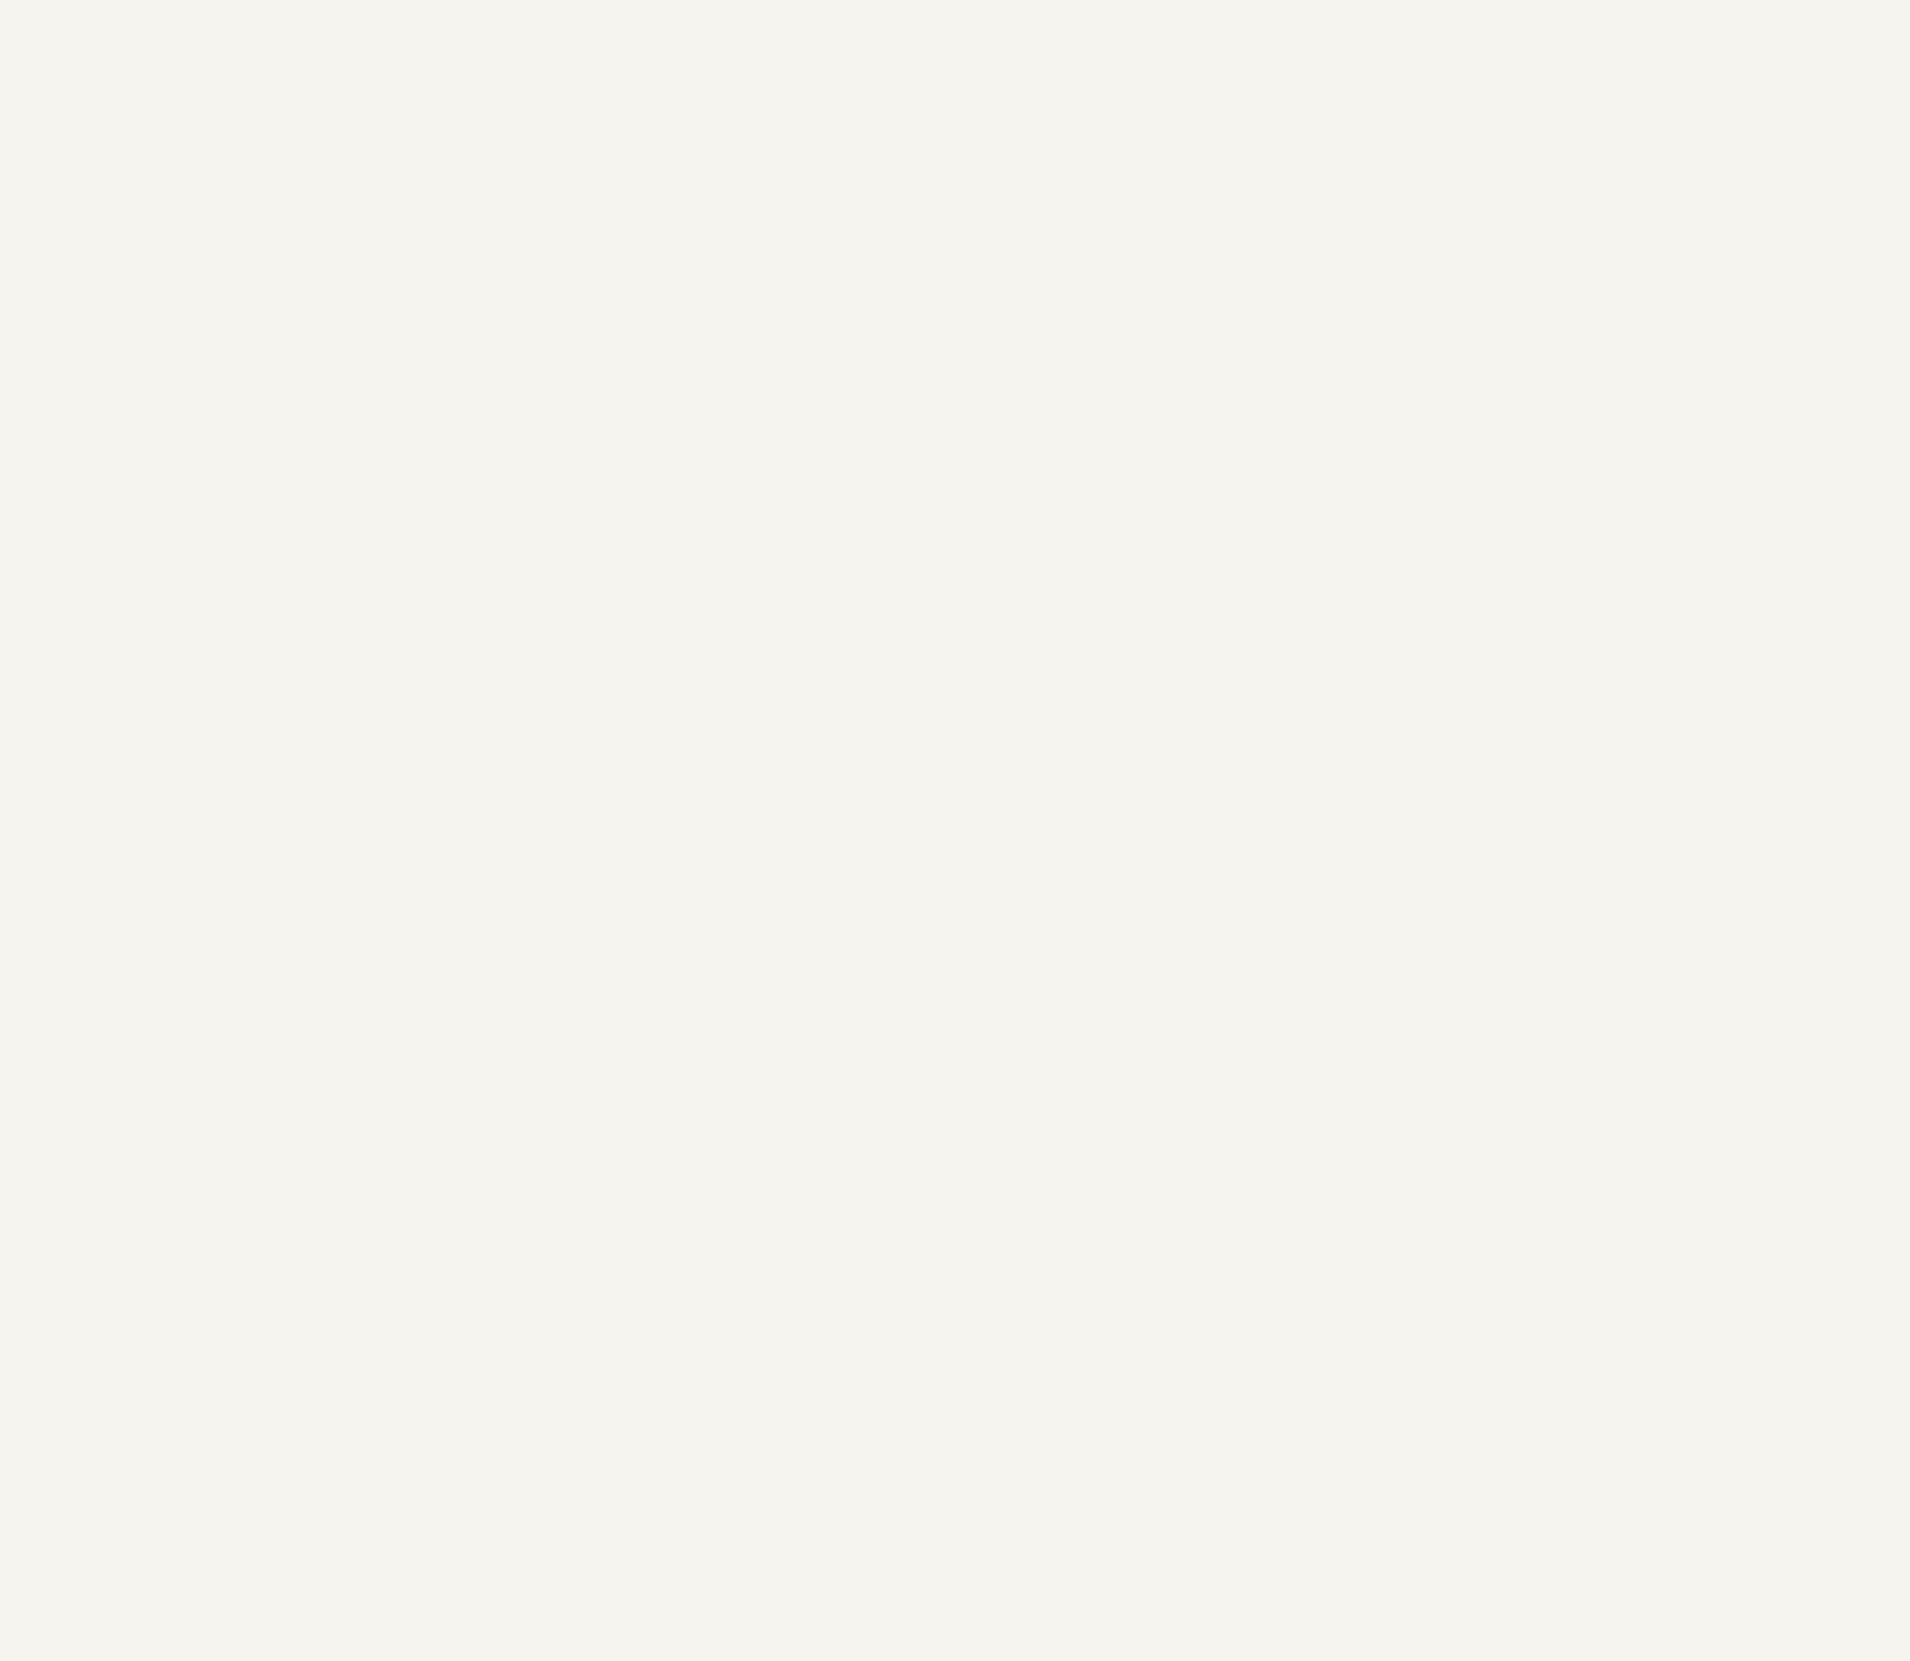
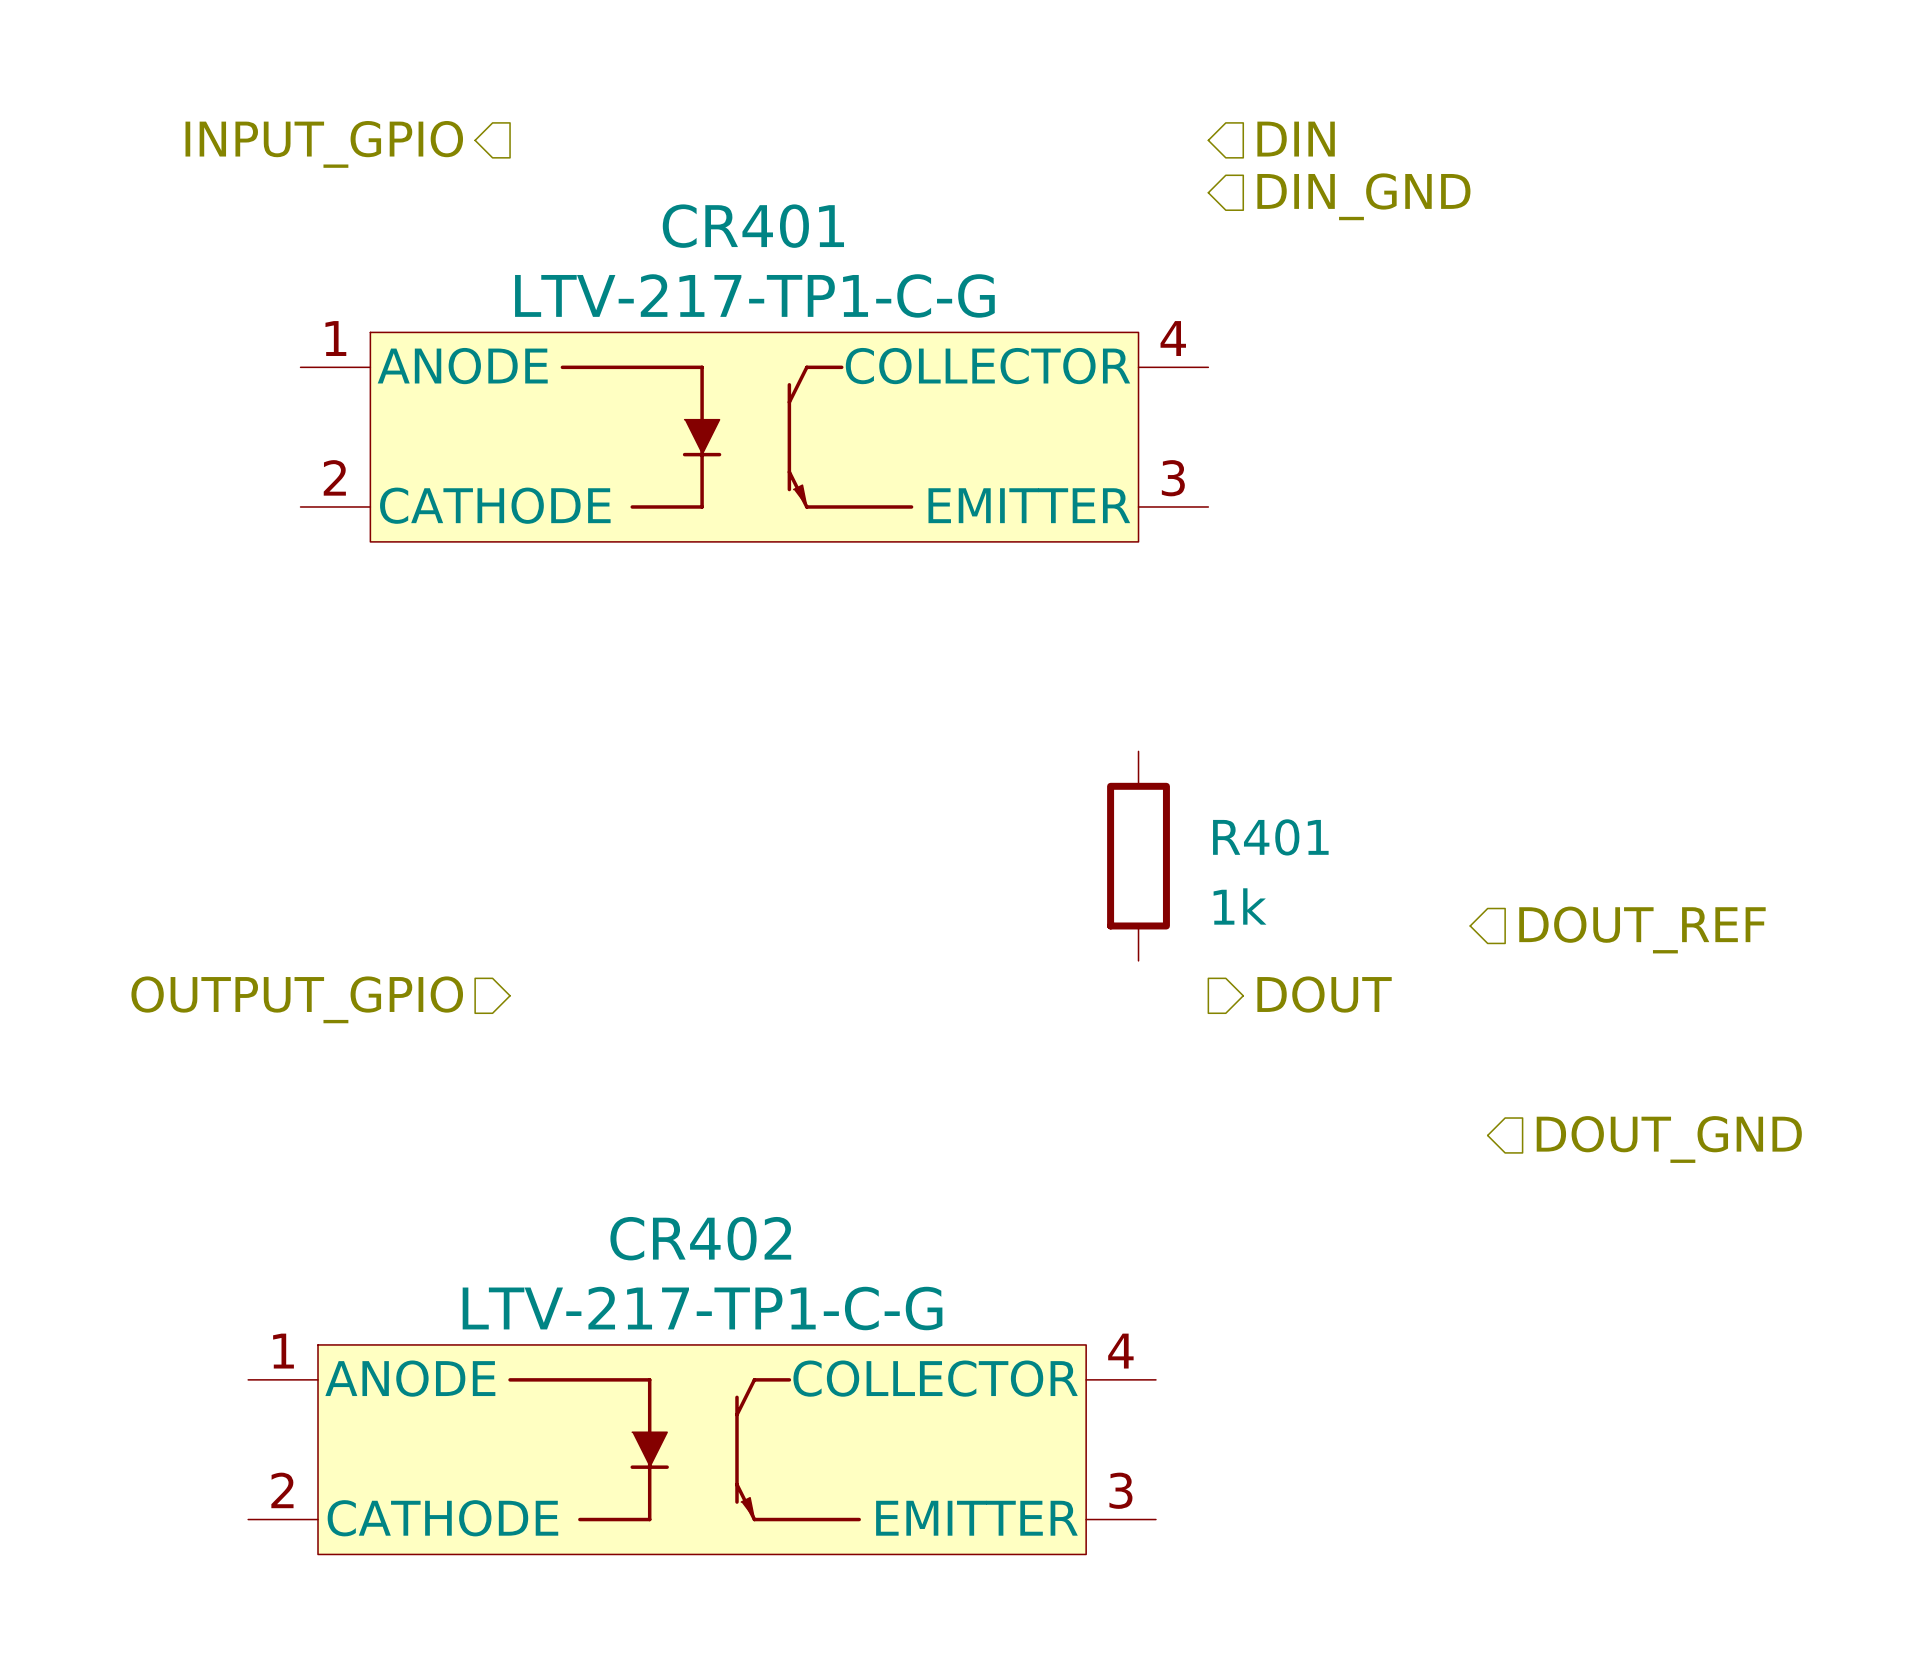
hierarchical label: none -> DIN (1296, 139)
hierarchical label: none -> INPUT_GPIO (324, 144)
hierarchical label: none -> DIN_GND (1363, 196)
CR401: none -> LTV-217-TP1-C-G (754, 437)
R401: none -> 1k (1138, 856)
hierarchical label: none -> DOUT_REF (1642, 930)
hierarchical label: none -> DOUT (1324, 994)
hierarchical label: none -> OUTPUT_GPIO (297, 999)
hierarchical label: none -> DOUT_GND (1669, 1139)
CR402: none -> LTV-217-TP1-C-G (702, 1449)

